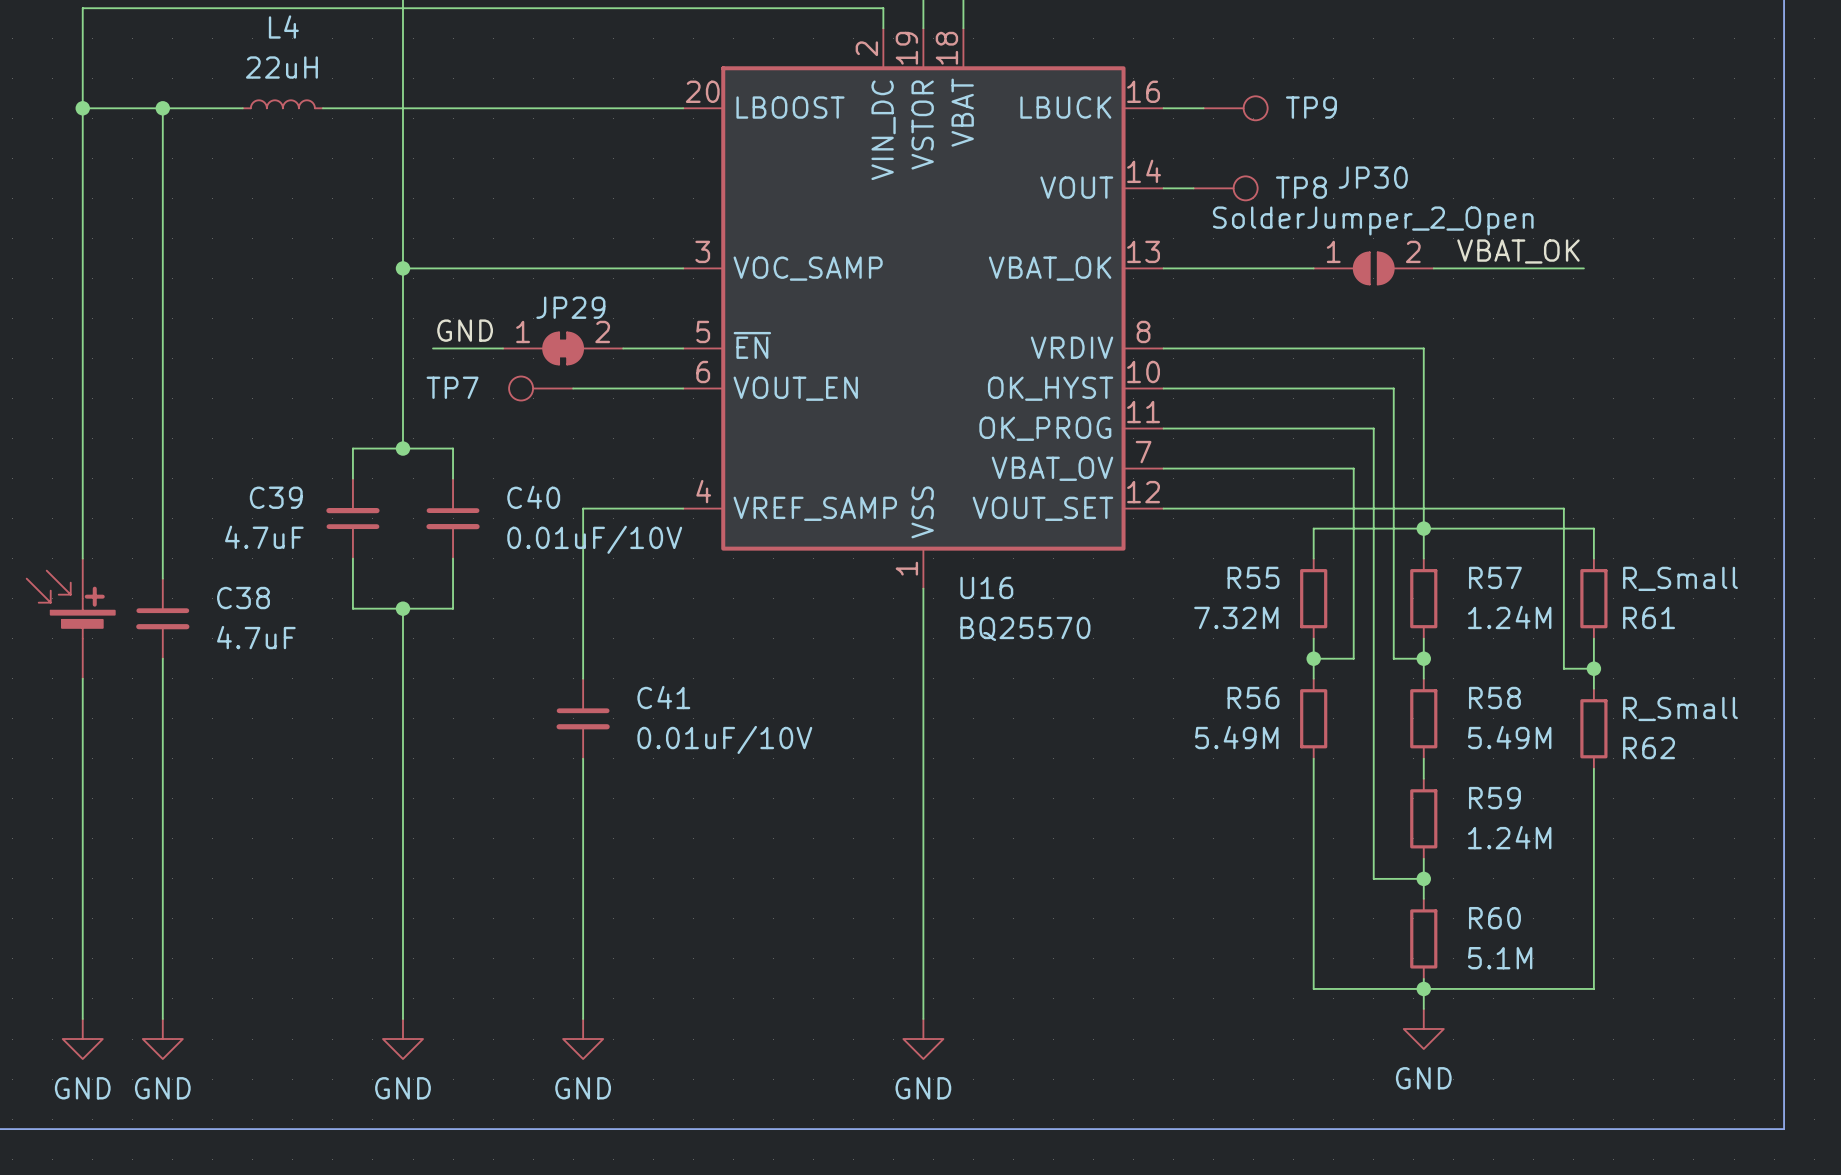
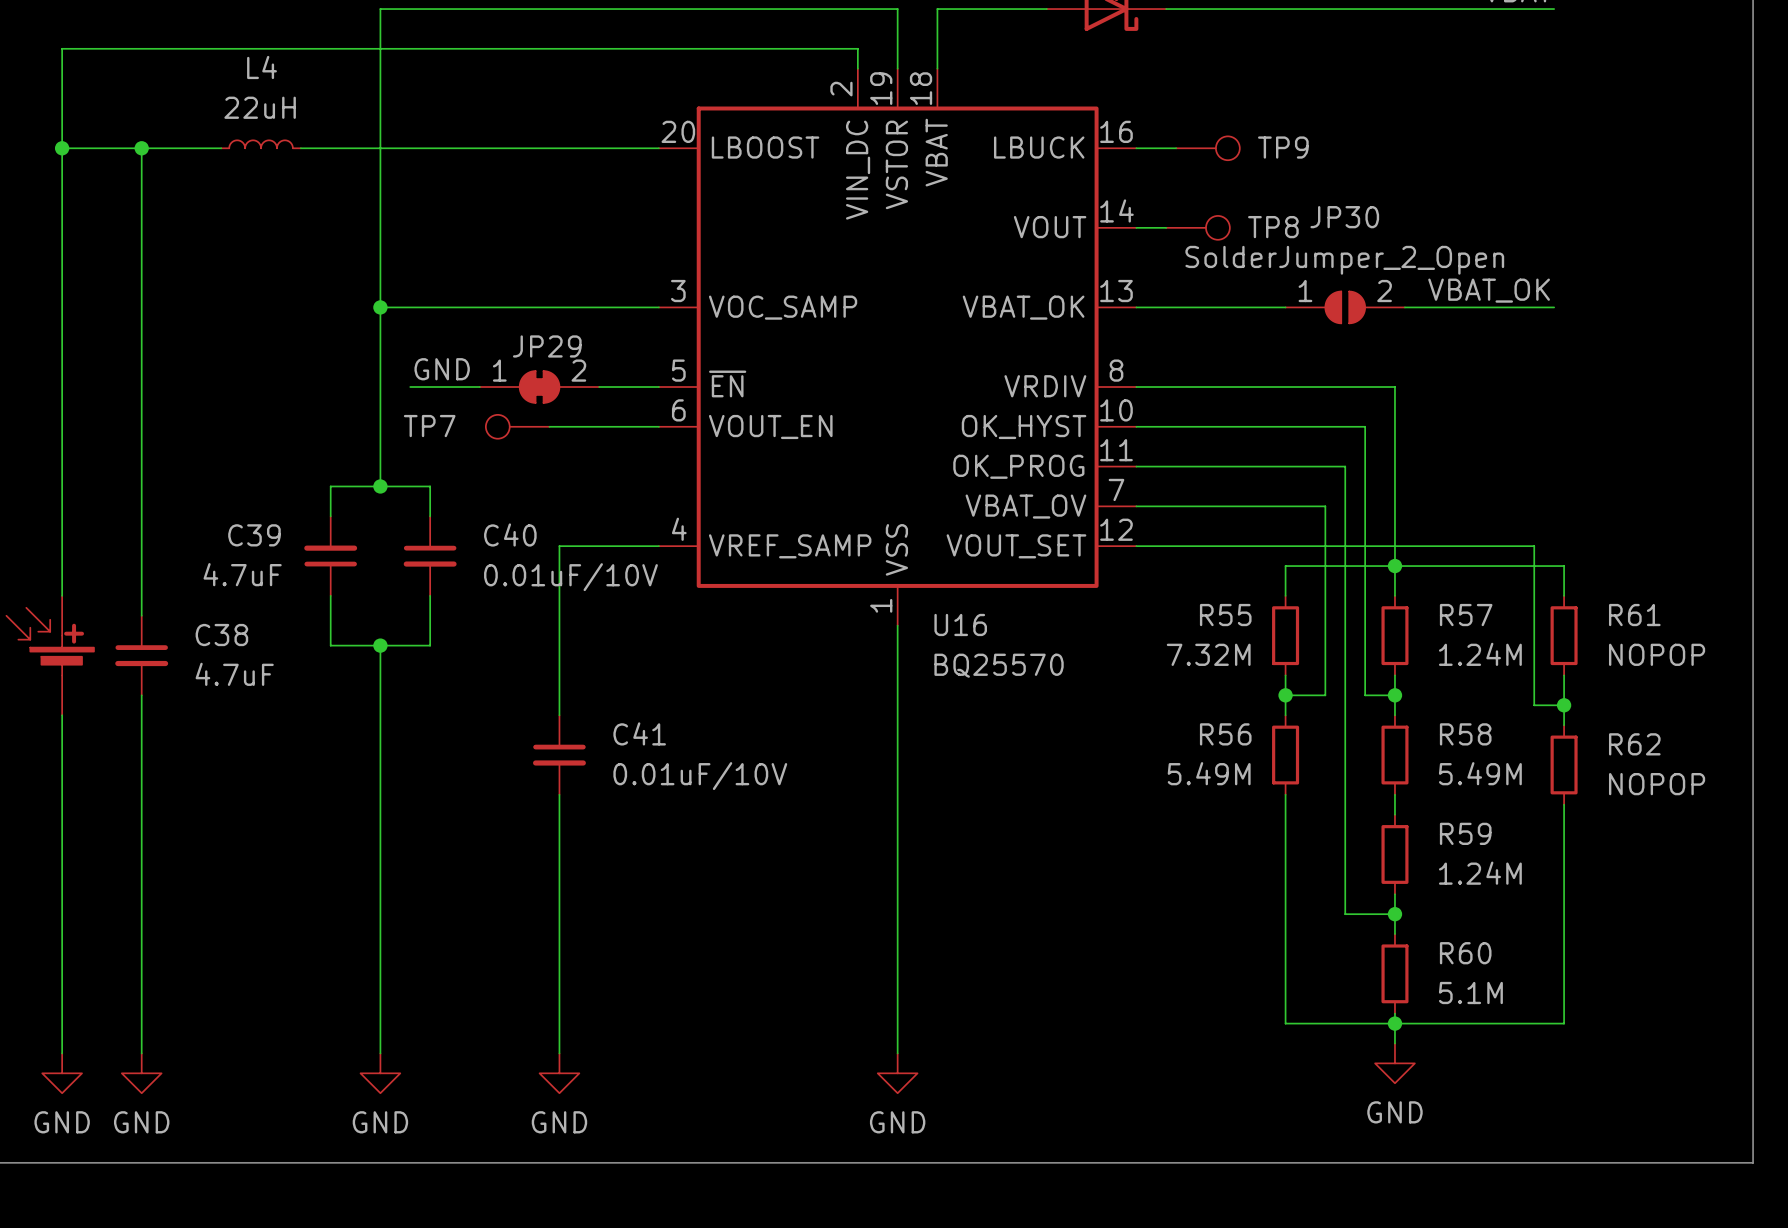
R61 value: R_Small (1680, 578) -> NOPOP (1657, 654)
R61 name position: R61 (1649, 617) -> R61 (1634, 615)
R62 value: R_Small (1680, 708) -> NOPOP (1657, 784)
R62 name position: R62 (1649, 748) -> R62 (1634, 744)

